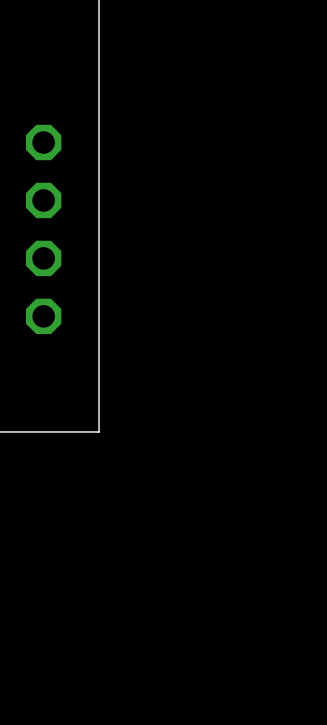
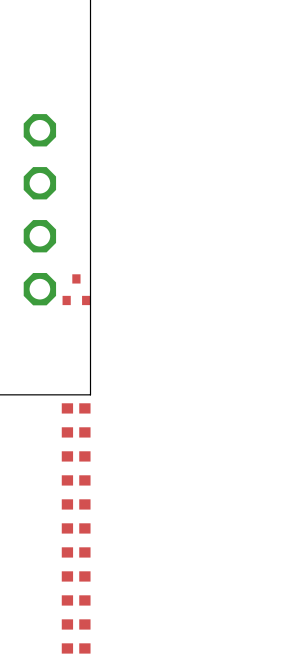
part: none -> (76, 289)
part: none -> (76, 408)
part: none -> (76, 432)
part: none -> (76, 456)
part: none -> (76, 480)
part: none -> (76, 504)
part: none -> (76, 528)
part: none -> (76, 552)
part: none -> (76, 576)
part: none -> (76, 600)
part: none -> (76, 624)
part: none -> (76, 648)

